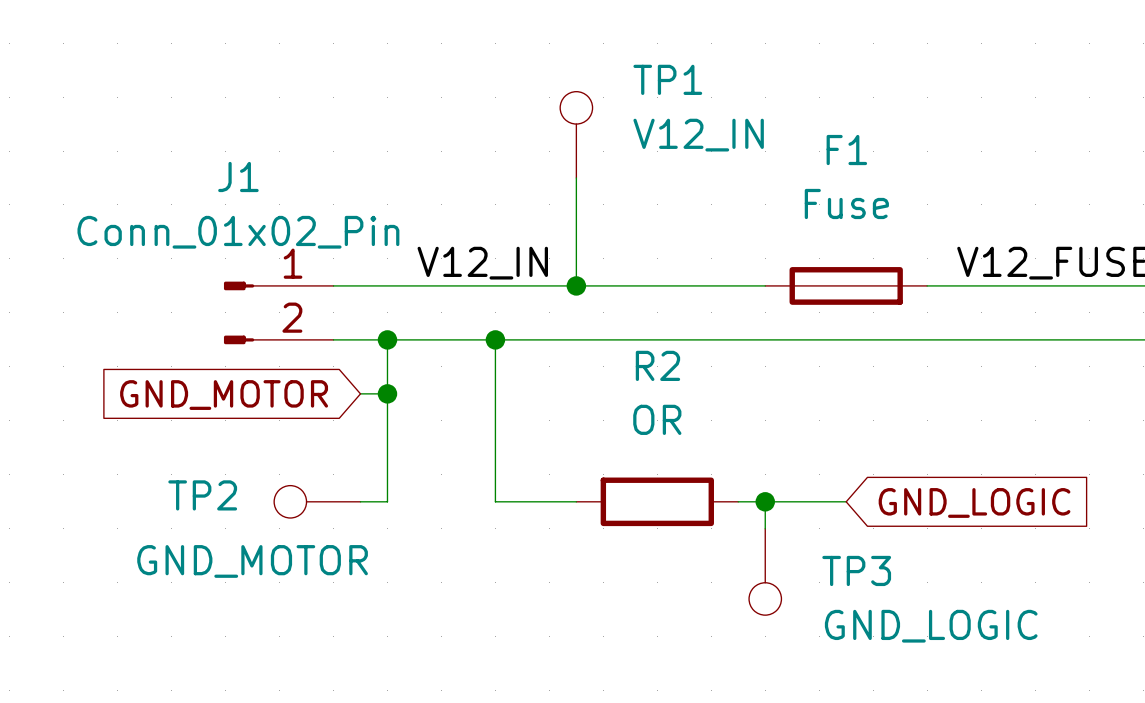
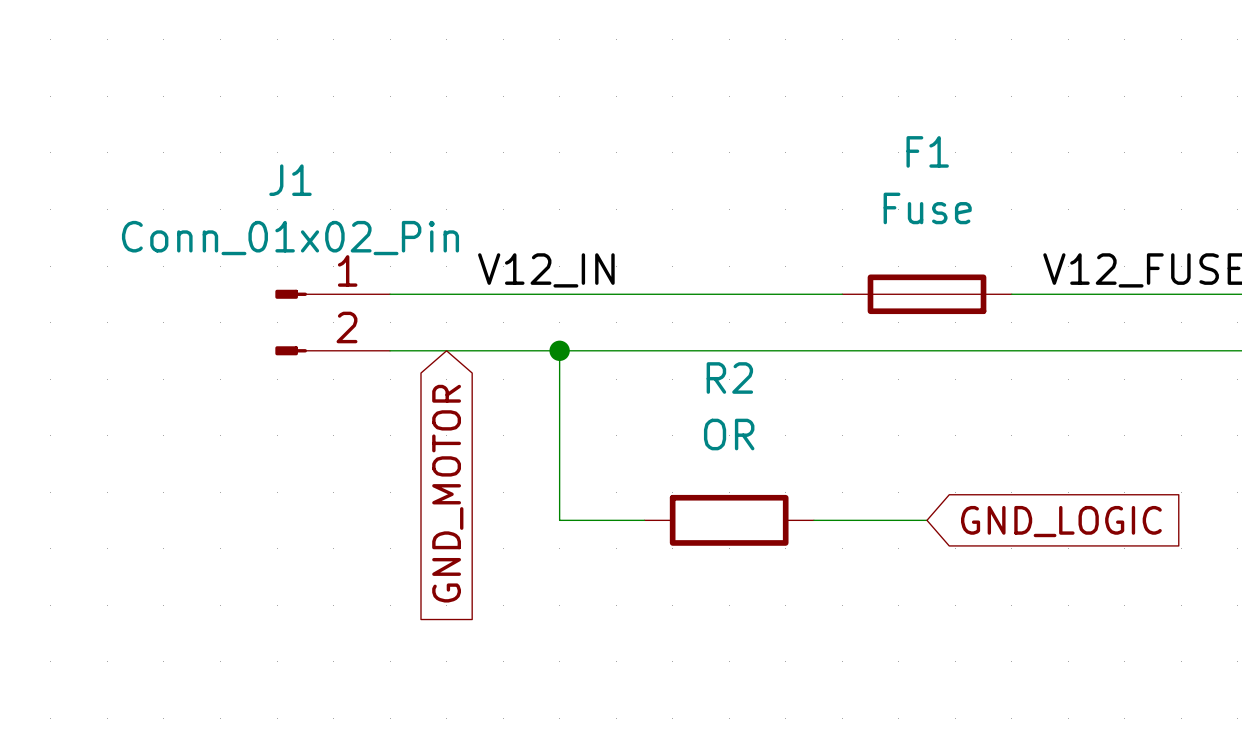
TP1: V12_IN (576, 134) -> none
wire: (576, 178) (576, 285) -> none
junction: (576, 285) -> none
wire: (387, 339) (387, 501) (360, 501) -> none
junction: (387, 339) -> none
wire: (360, 393) (387, 393) -> none
junction: (387, 393) -> none
global label rotation: 0° (224, 395) -> 90° counterclockwise (447, 493)
TP2: GND_MOTOR (317, 501) -> none
wire: (765, 501) (765, 528) -> none
junction: (765, 501) -> none
TP3: GND_LOGIC (765, 571) -> none

